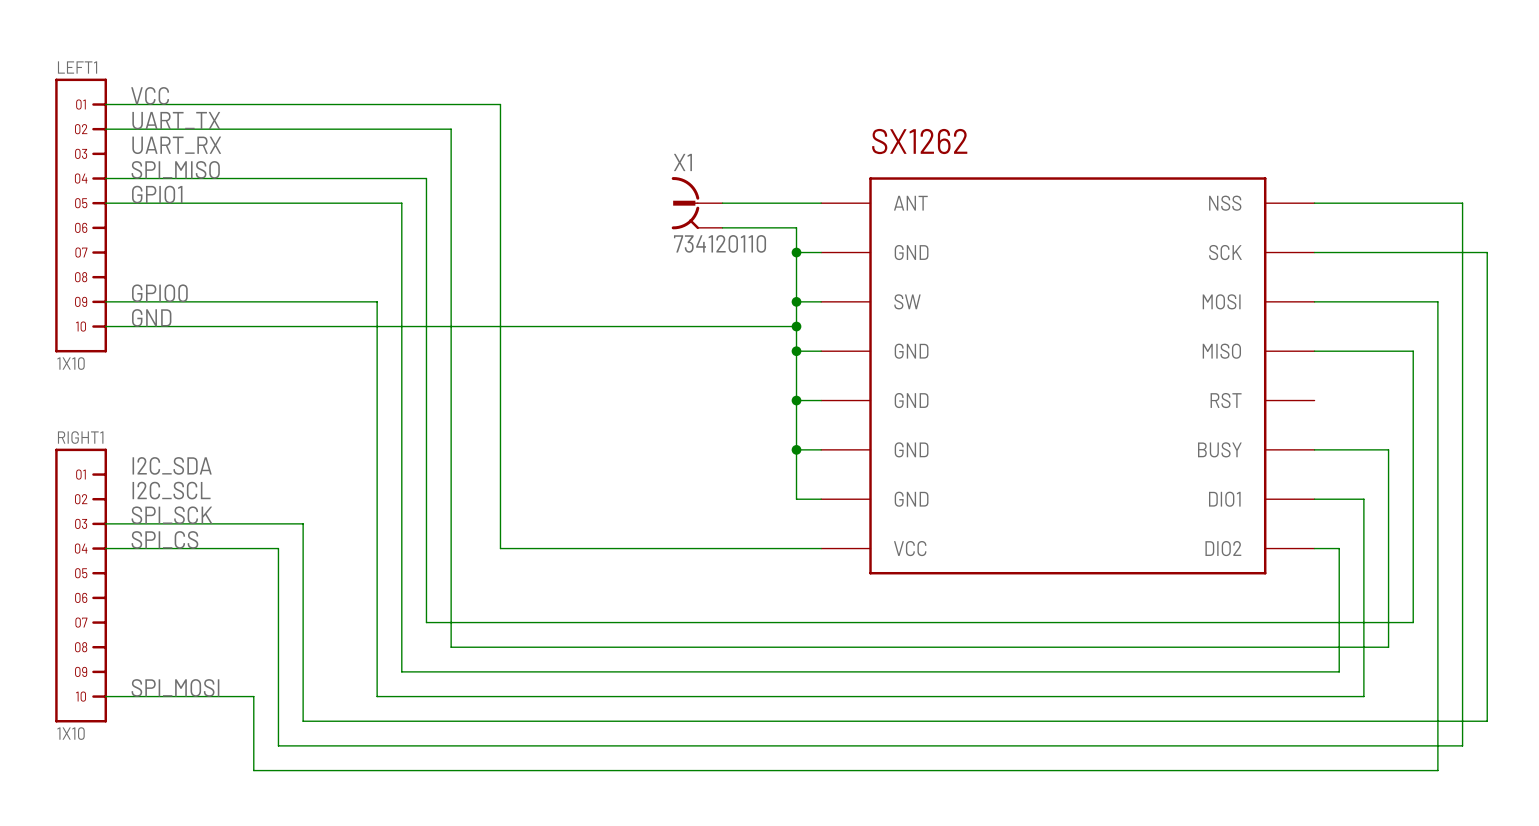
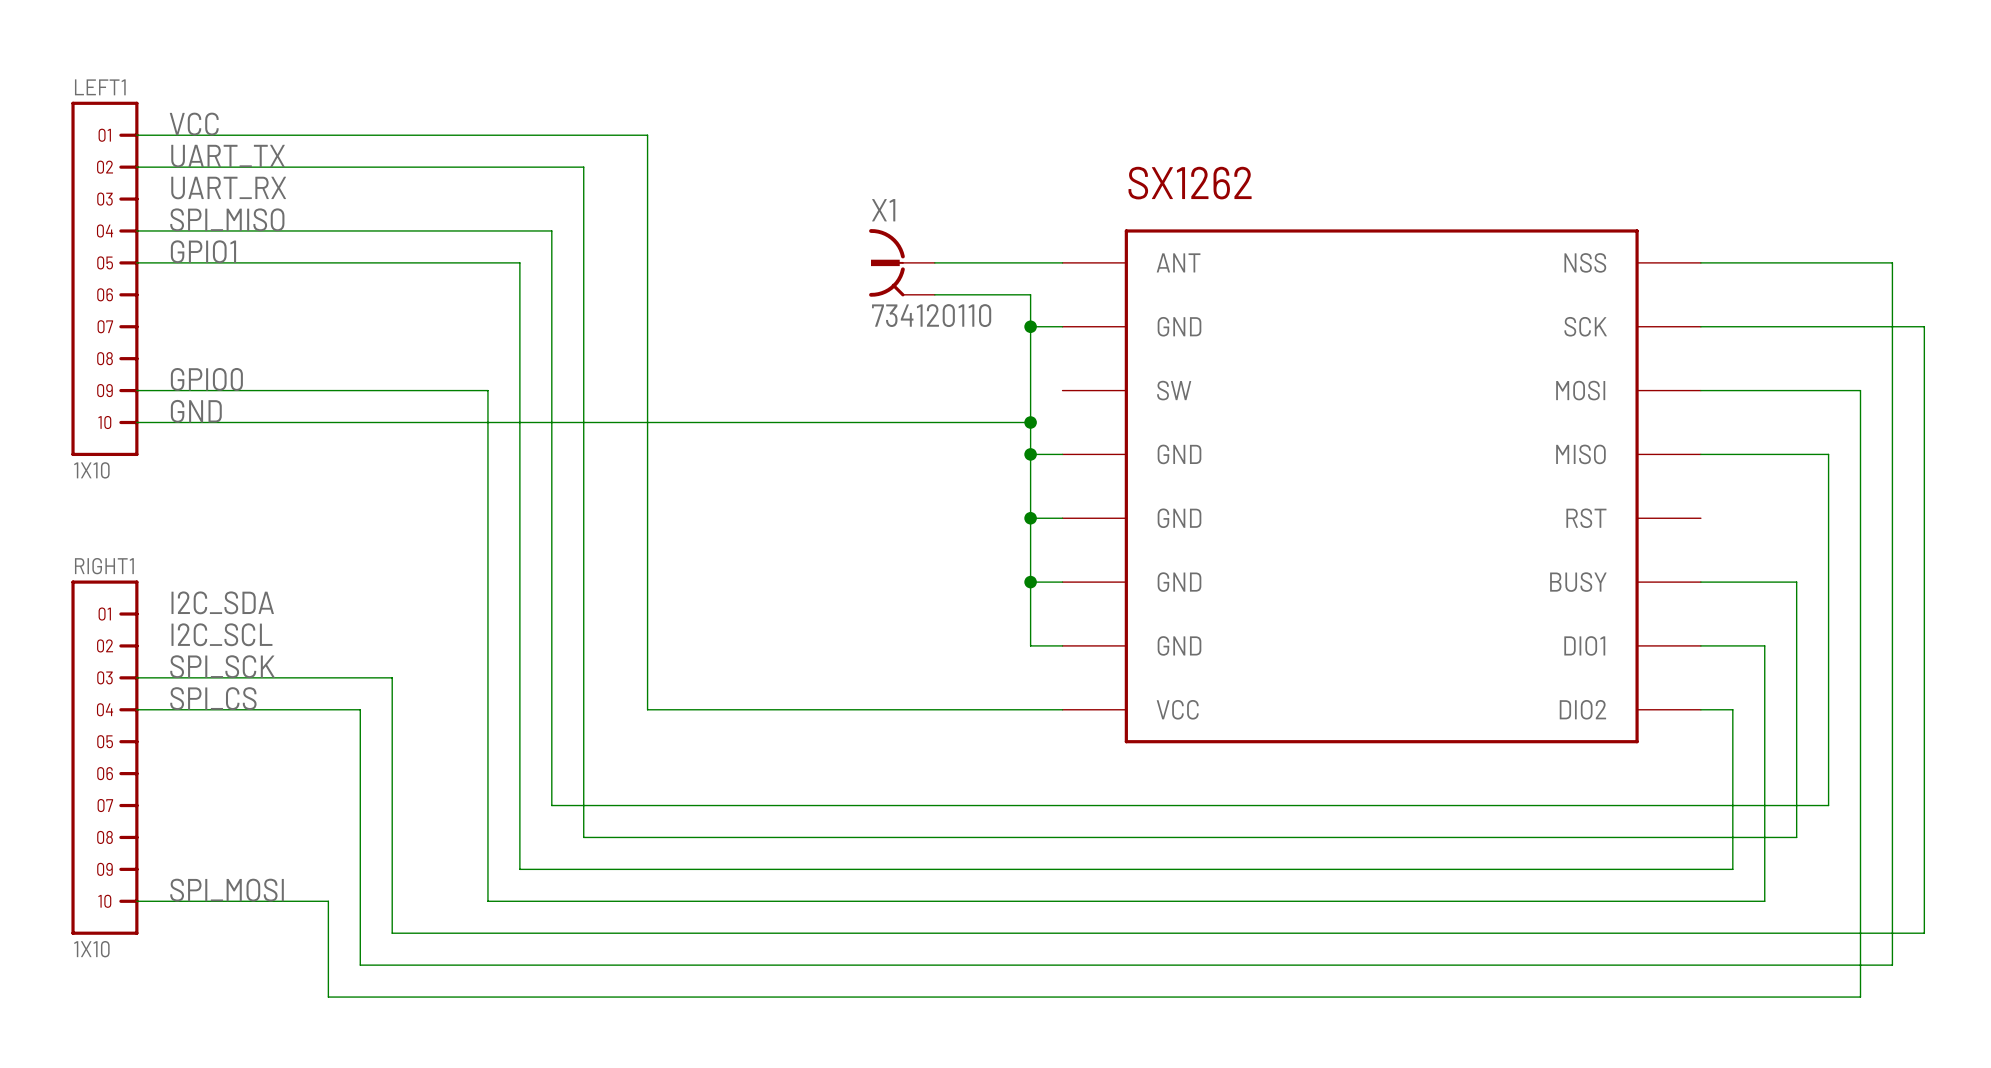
wire: (796, 301) (821, 301) -> none
junction: (796, 301) -> none

